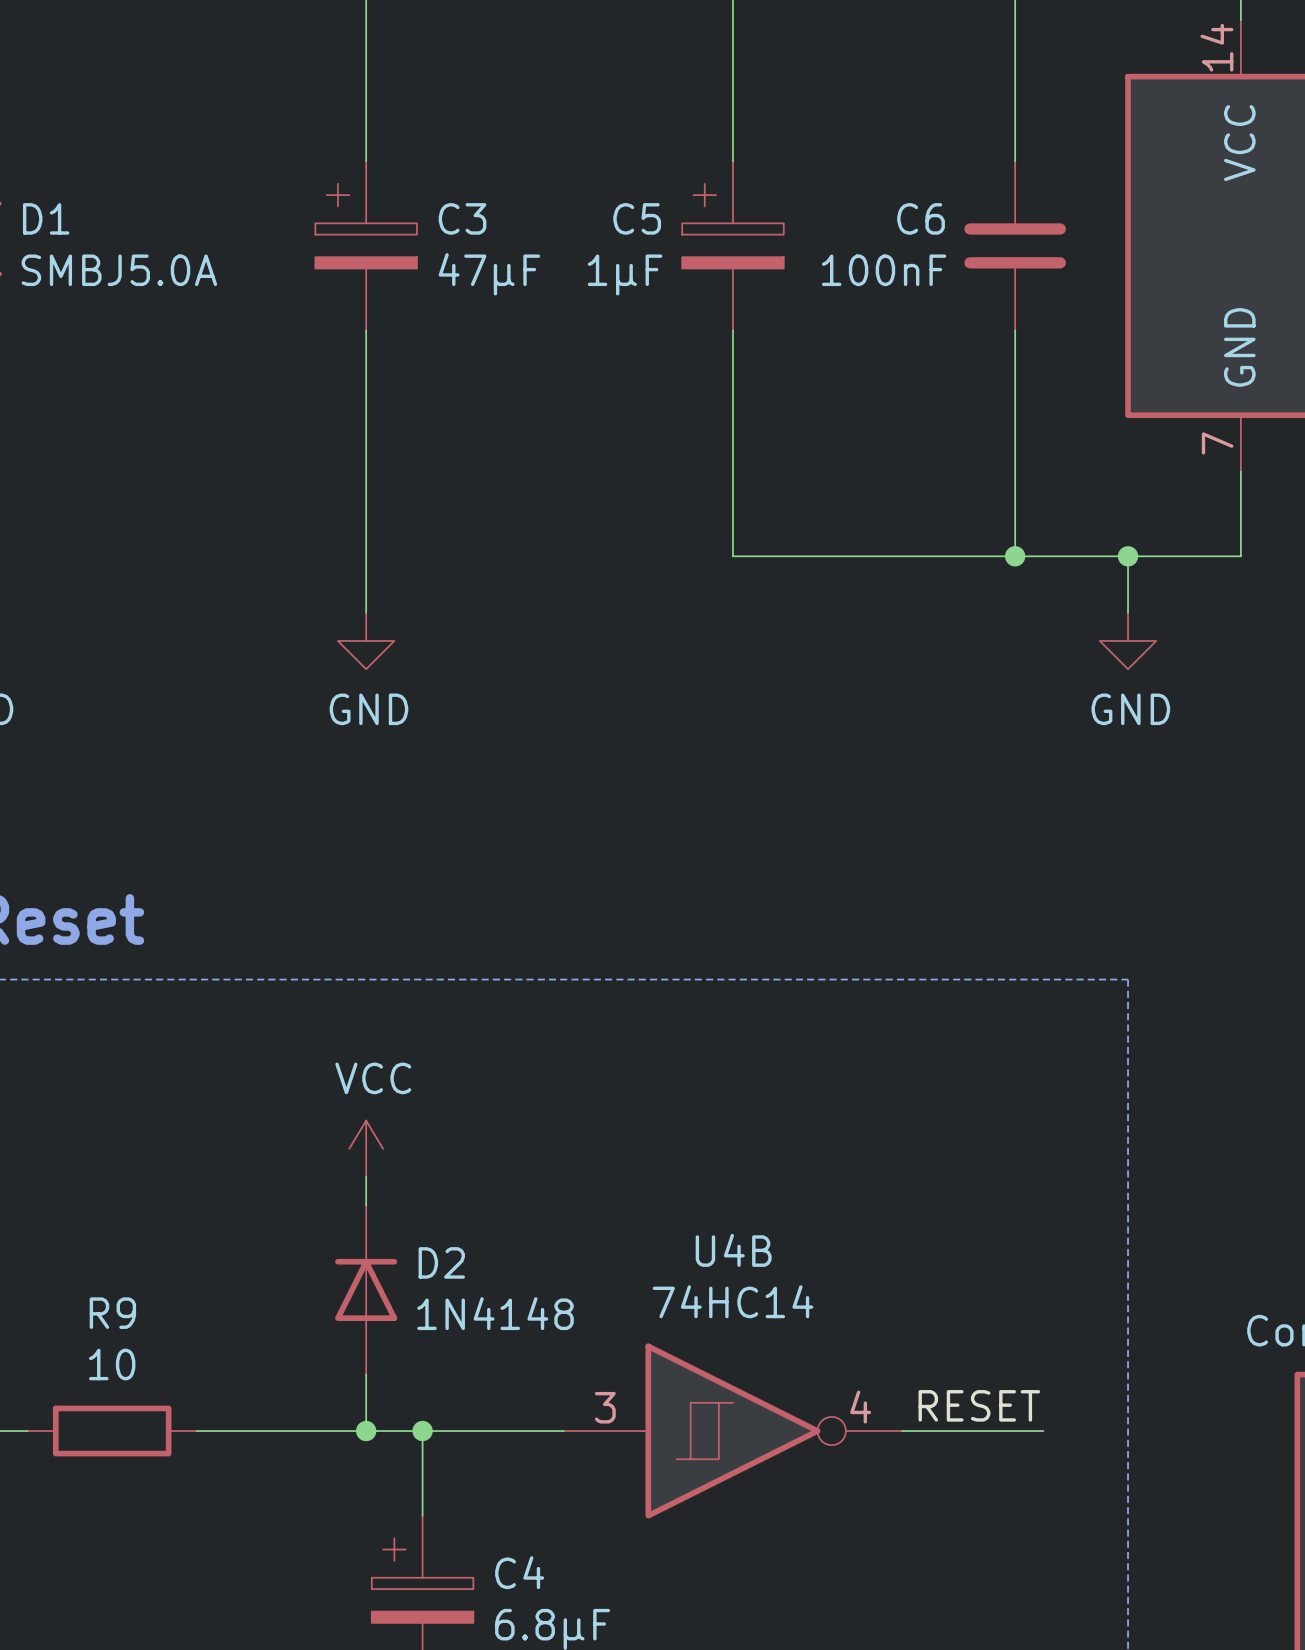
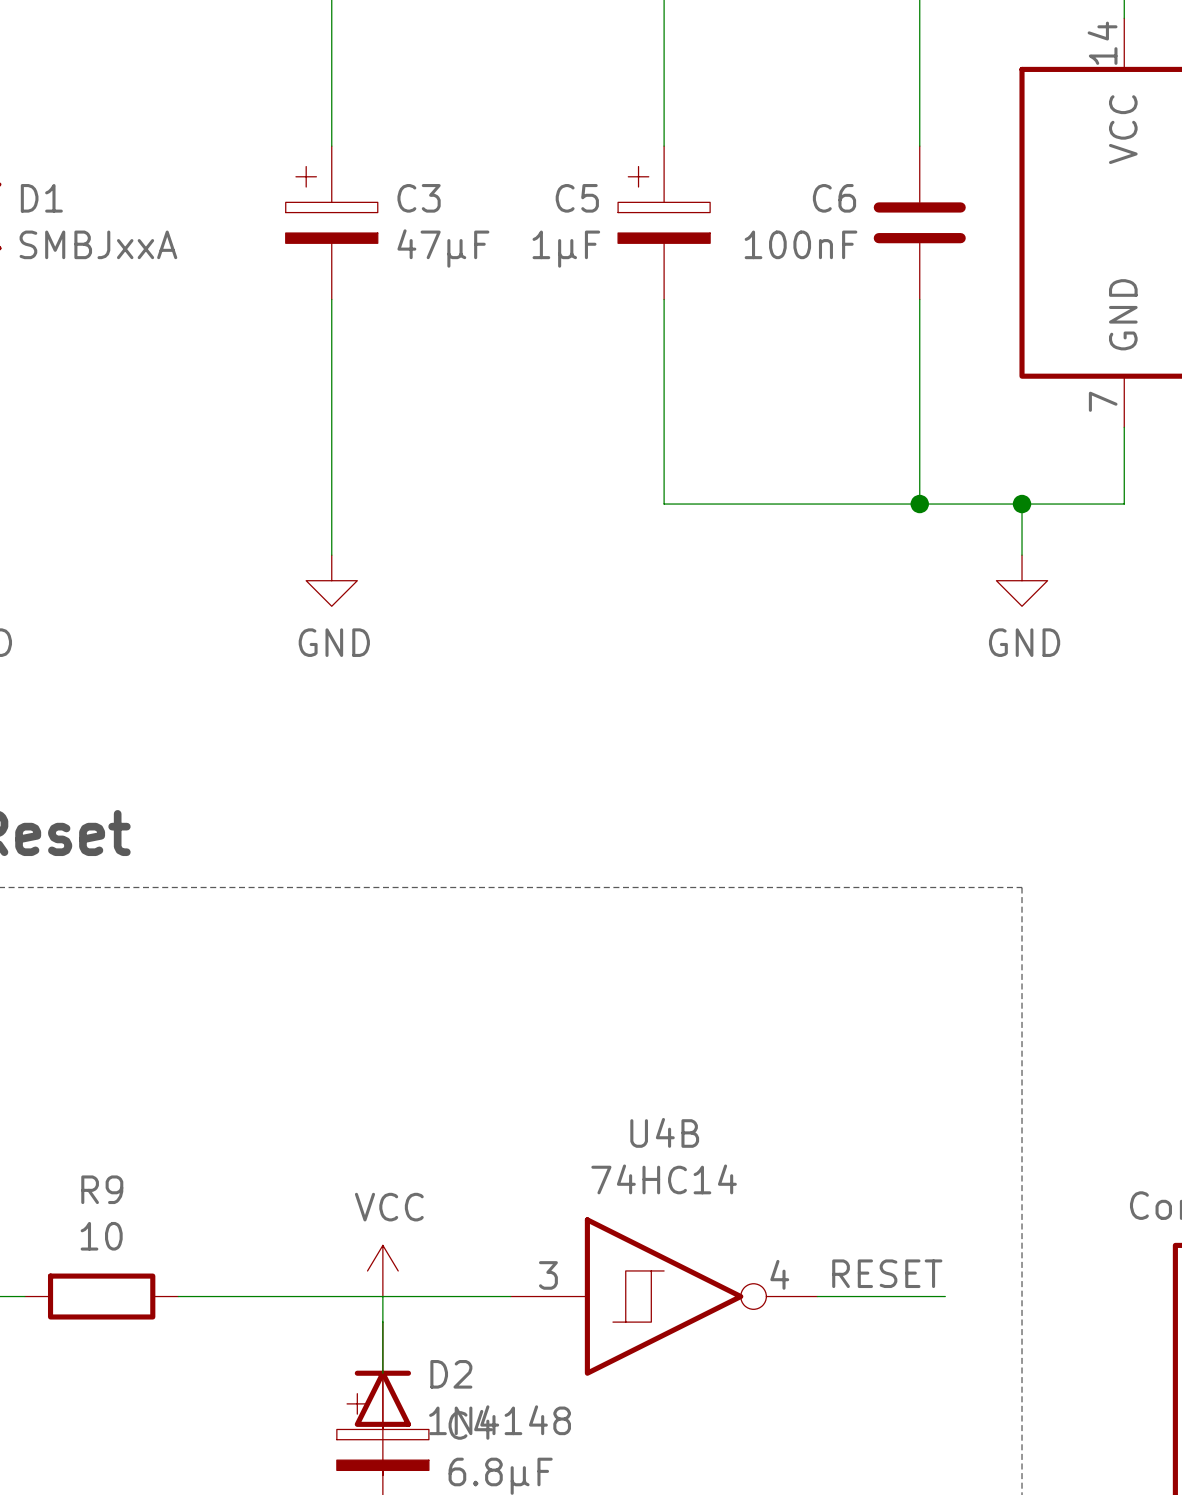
D1 value: SMBJ5.0A (119, 270) -> SMBJxxA (98, 244)
power symbol position: VCC (366, 1148) -> VCC (382, 1270)
wire: (366, 1177) (366, 1205) -> none
D2 position: (366, 1289) -> (382, 1398)
wire: (366, 1374) (366, 1431) -> none
junction: (366, 1431) -> none
junction: (422, 1431) -> none

